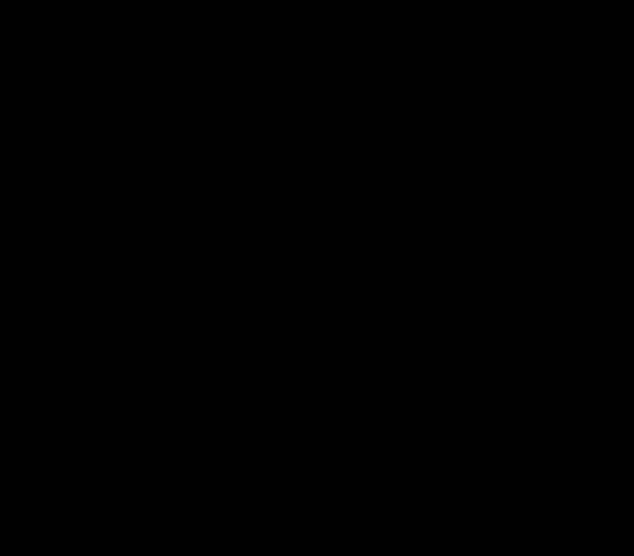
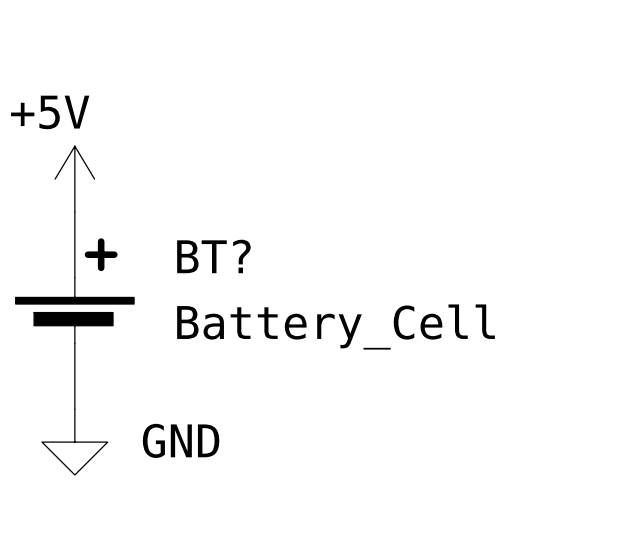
power symbol: none -> +5V (74, 179)
BT?: none -> Battery_Cell (74, 310)
power symbol: none -> GND (74, 442)

